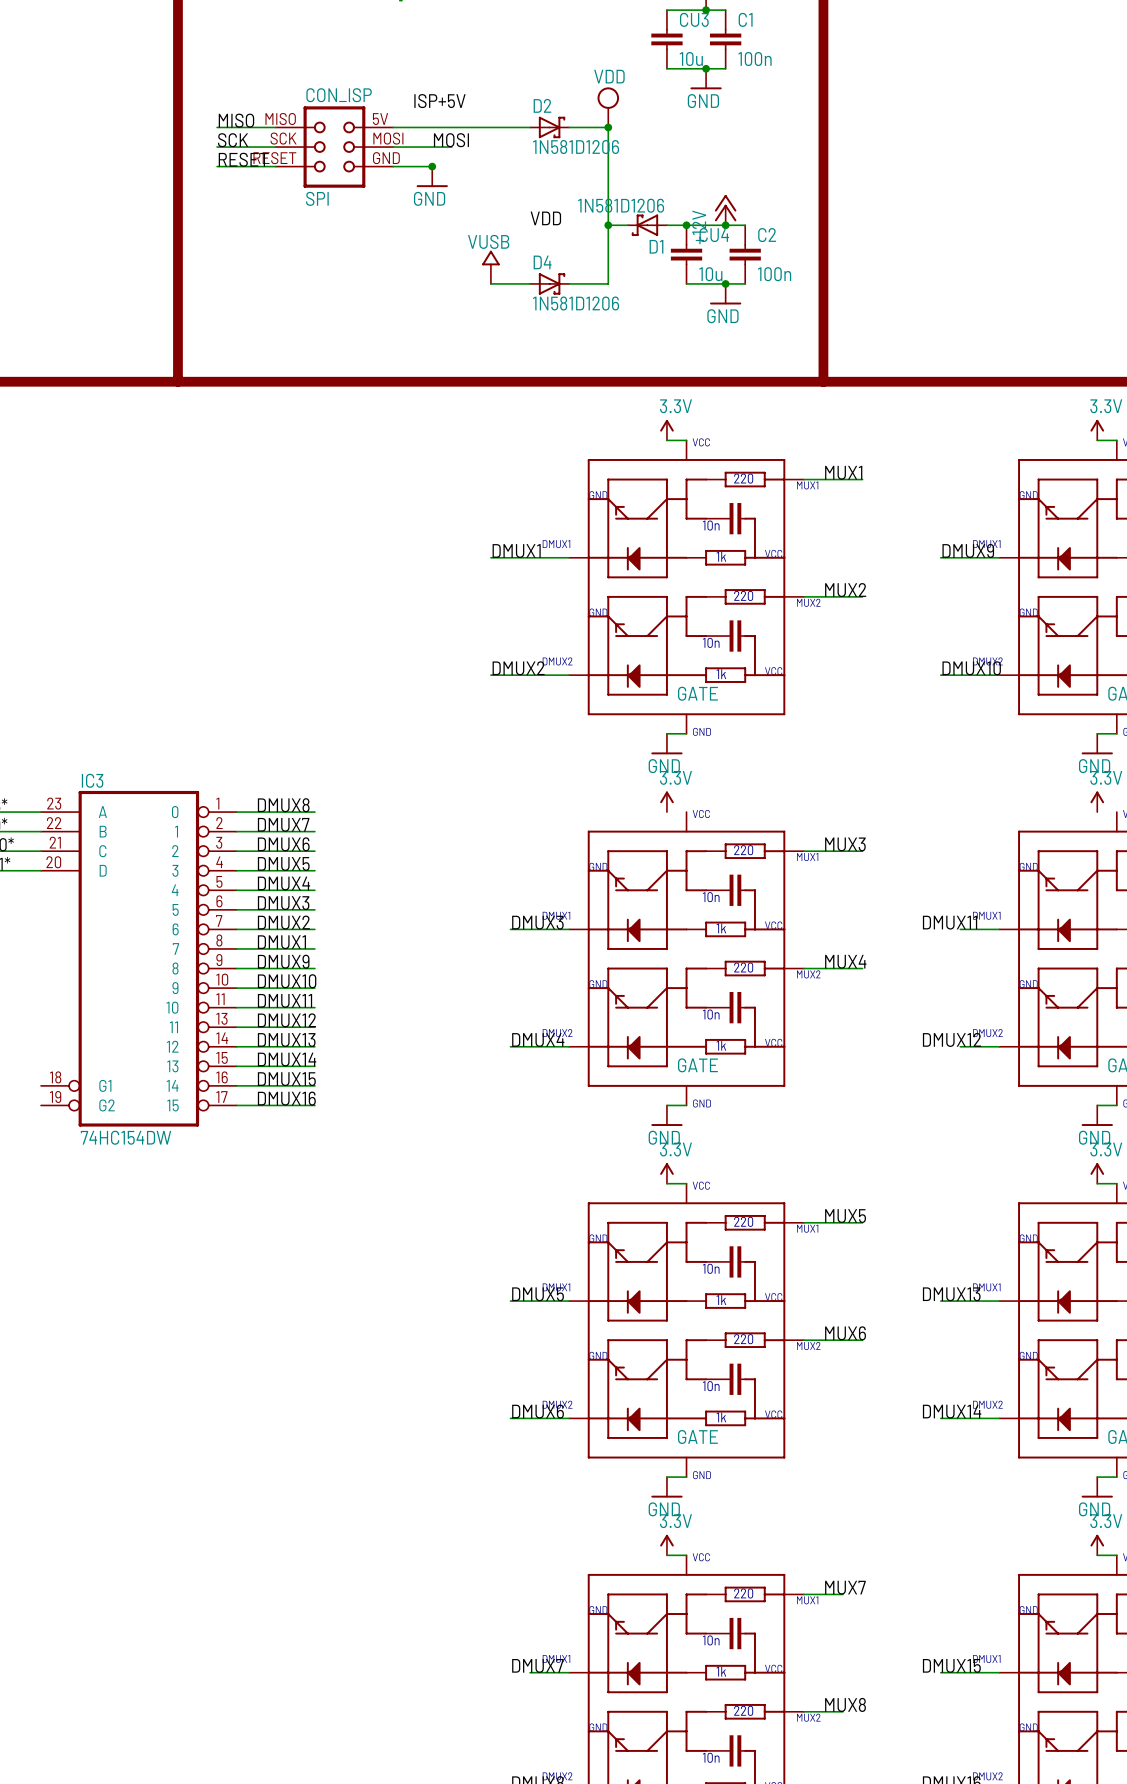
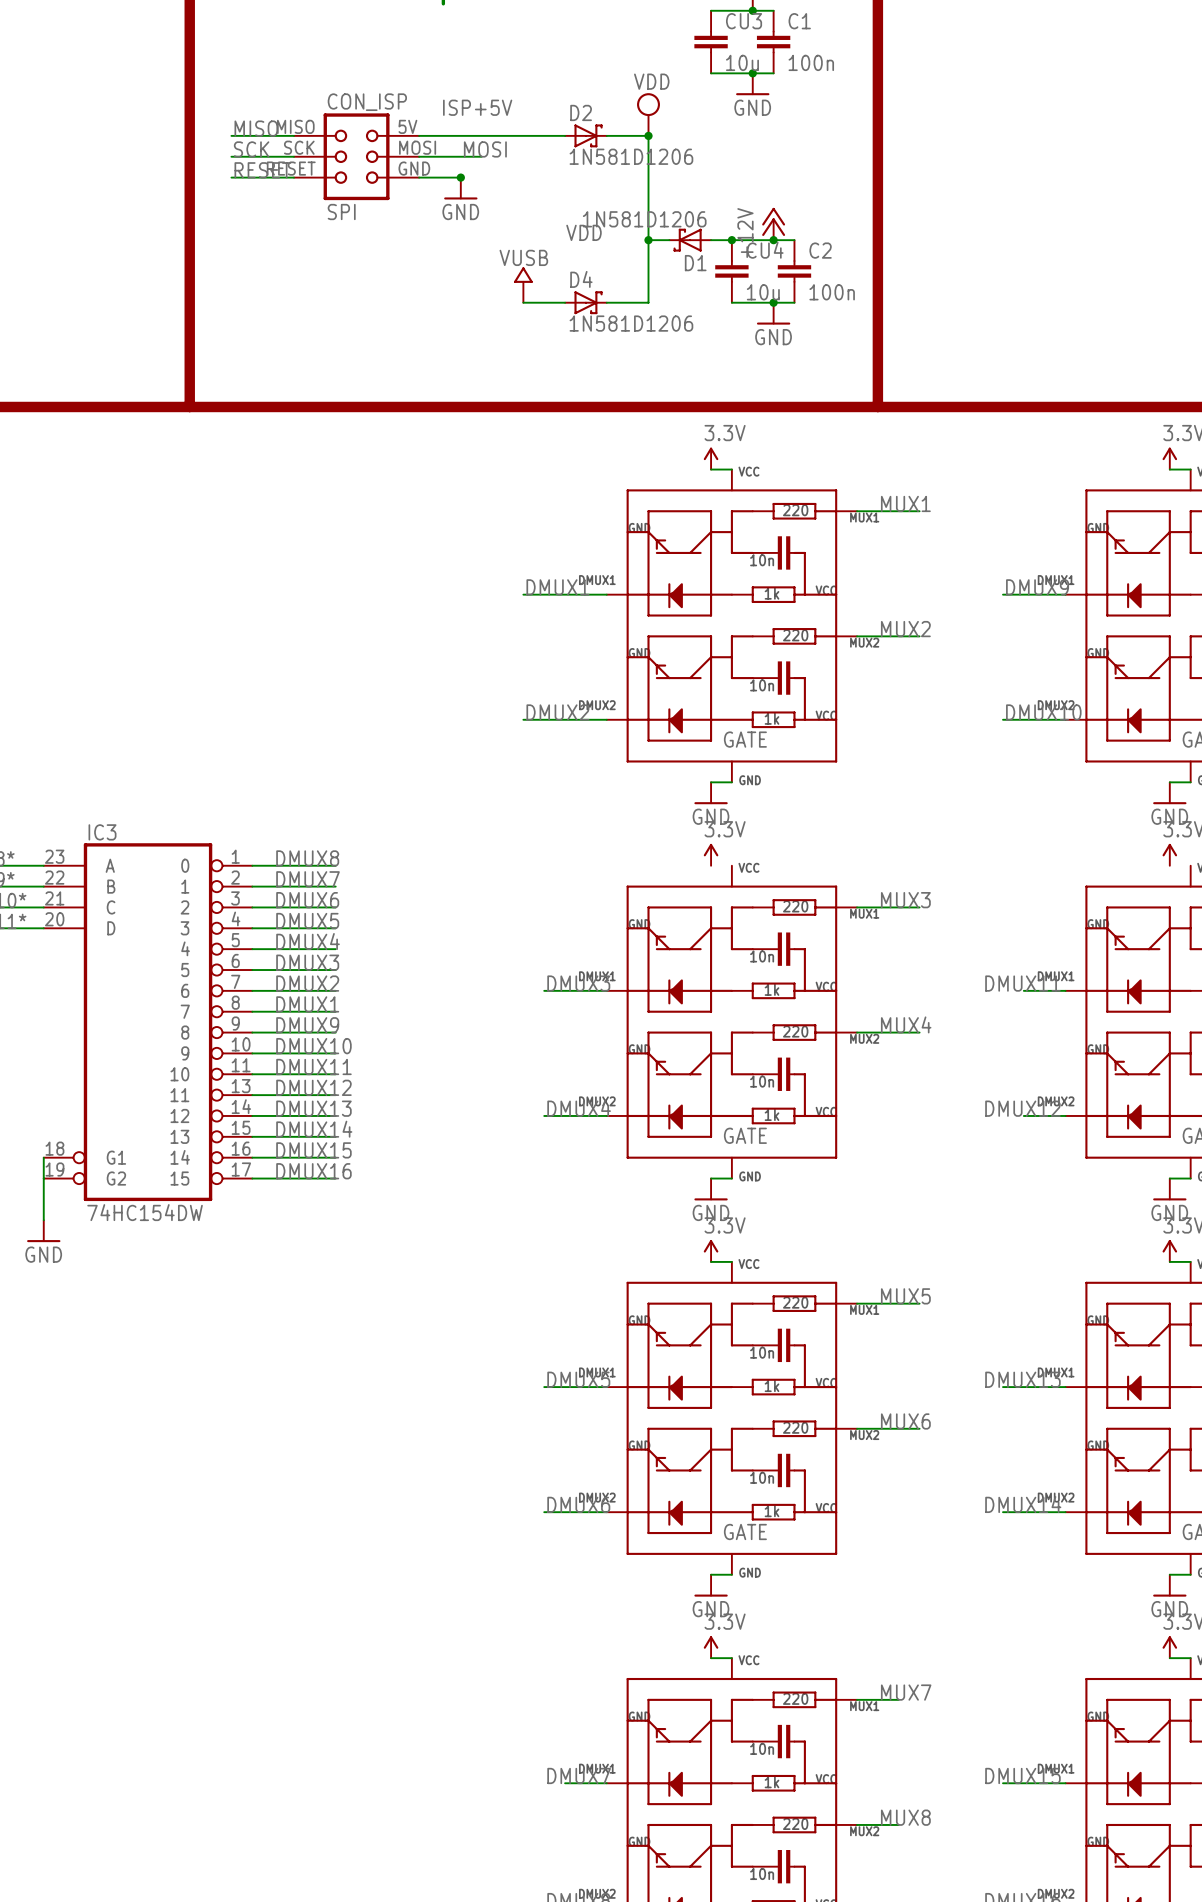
wire: none -> (43, 1157) (43, 1220)
power symbol: none -> GND (43, 1231)

